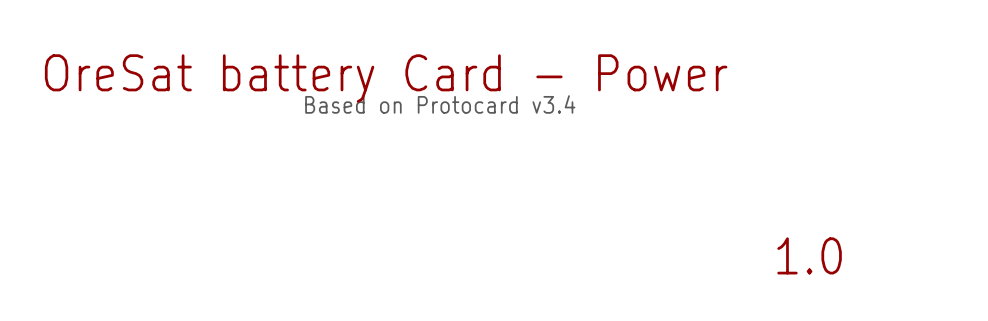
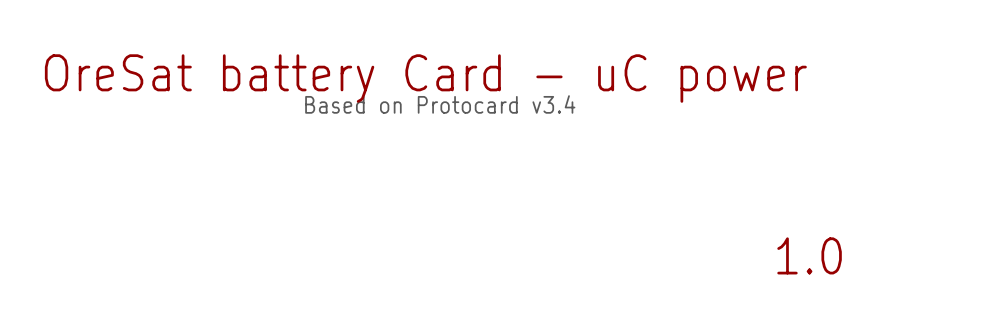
text: OreSat battery Card - Power (386, 78) -> OreSat battery Card - uC power (425, 78)

